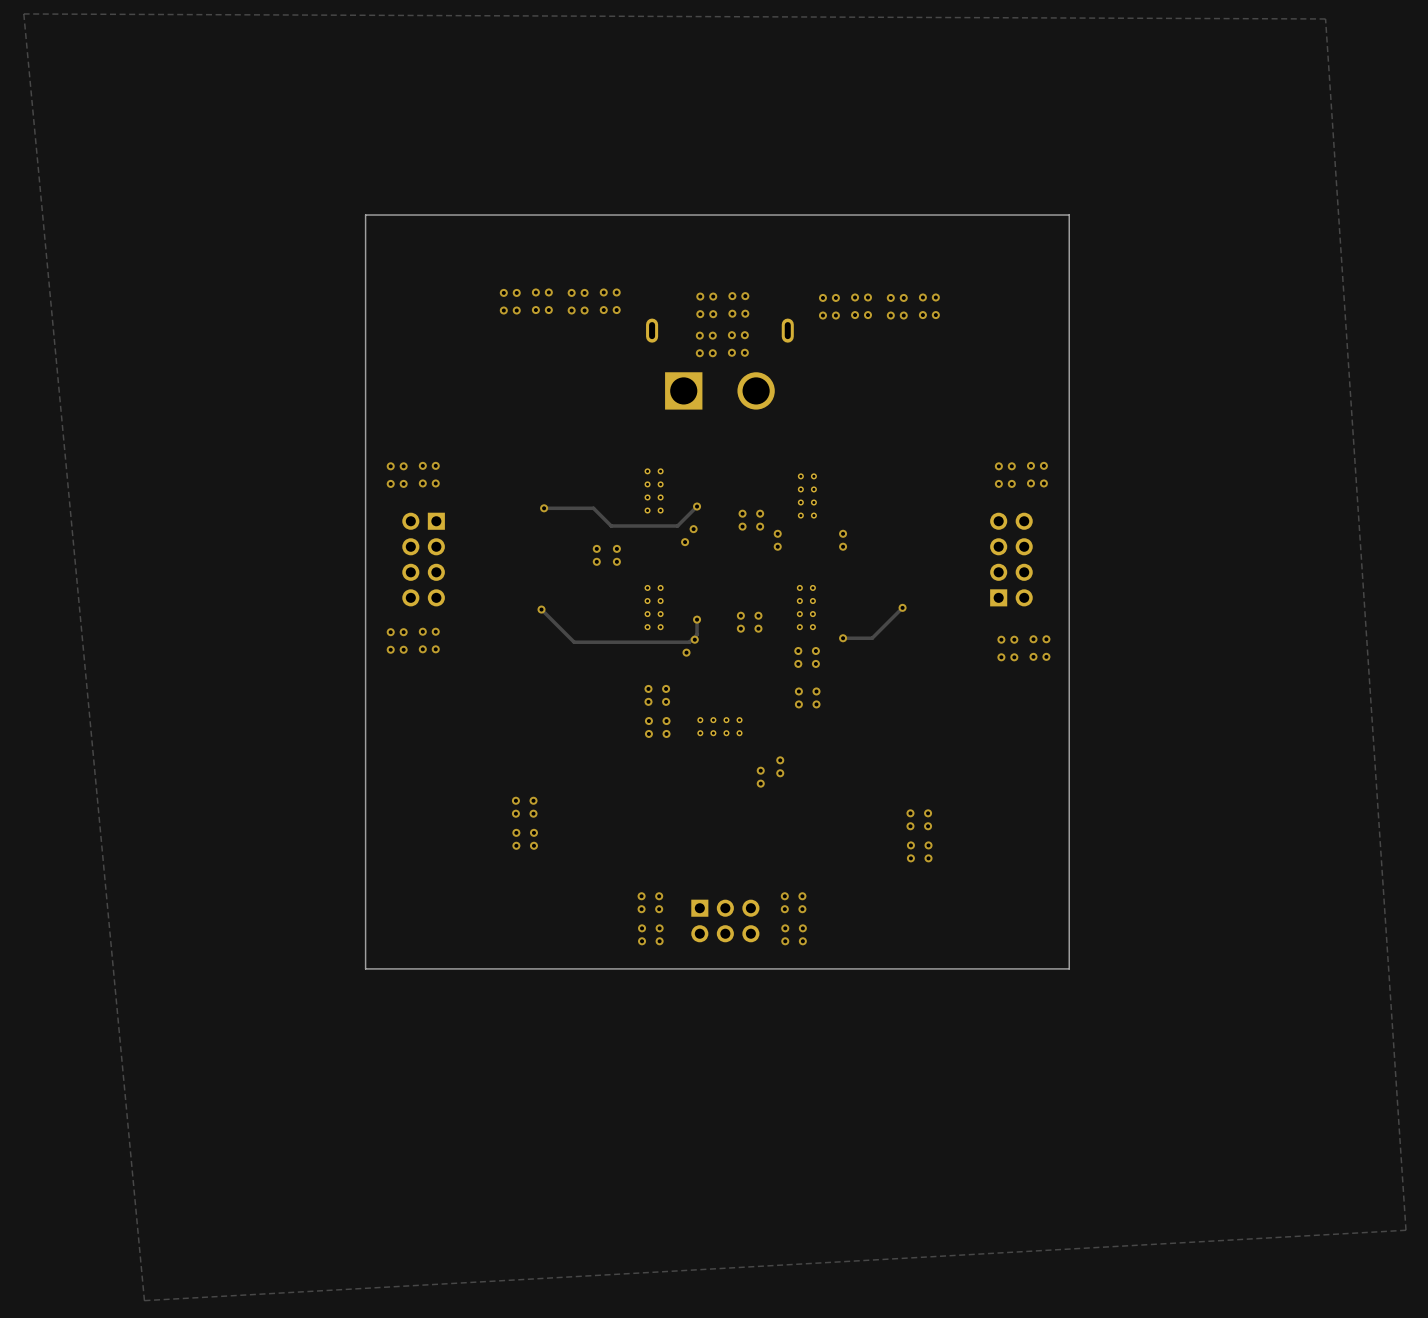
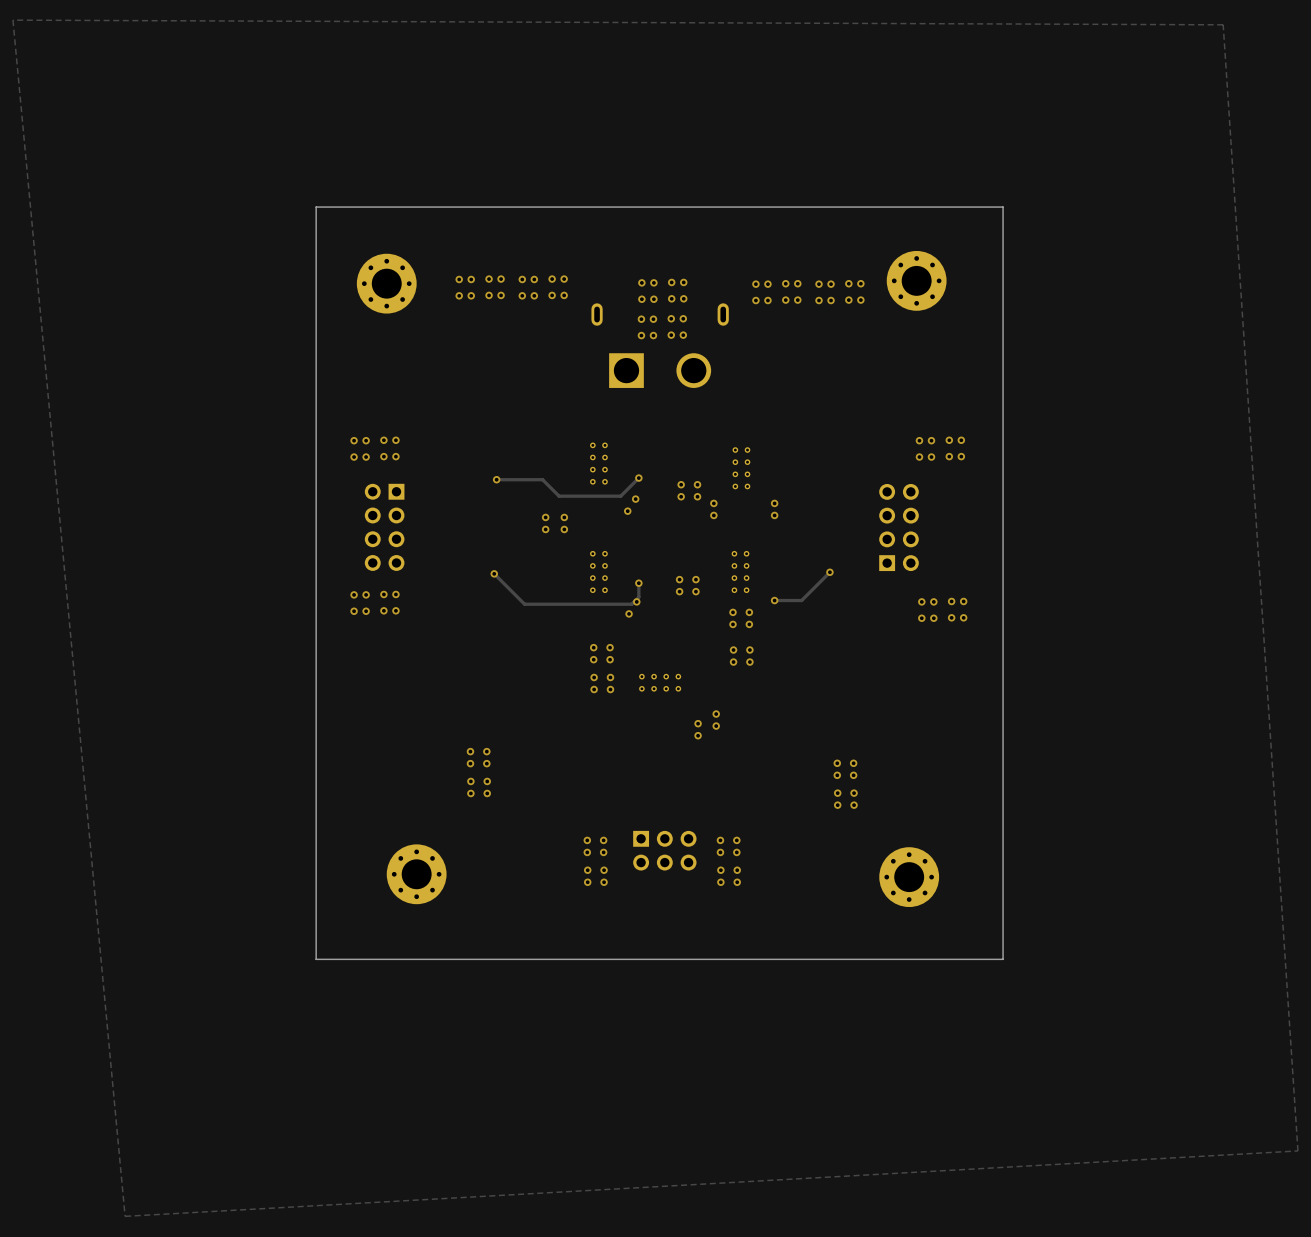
board edge: (1069, 215) (1069, 968) (365, 968) (365, 215) -> (984, 207) (1003, 207) (1003, 959) (316, 959) (316, 207) (330, 207)
part: none -> (916, 280)
part: none -> (386, 283)
part position: (1011, 559) -> (899, 527)
part position: (725, 920) -> (664, 850)
part: none -> (416, 874)
part: none -> (909, 877)

